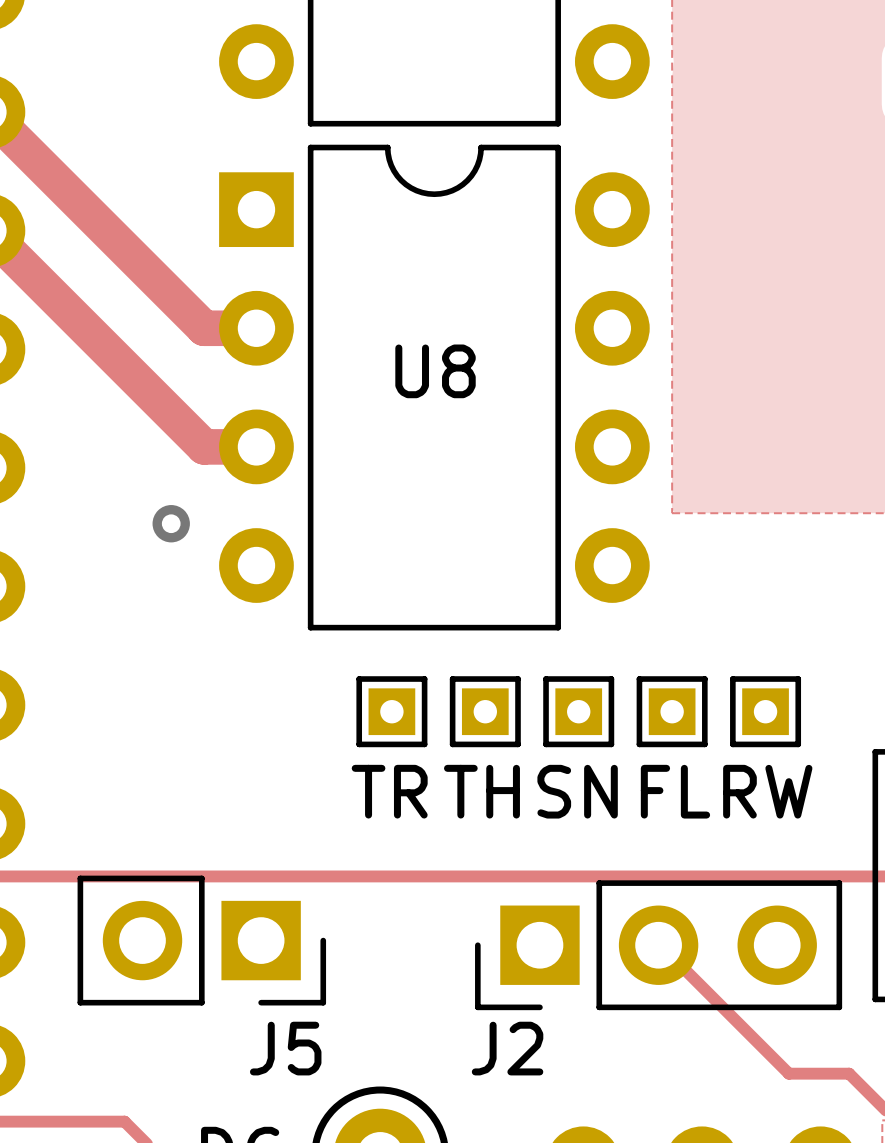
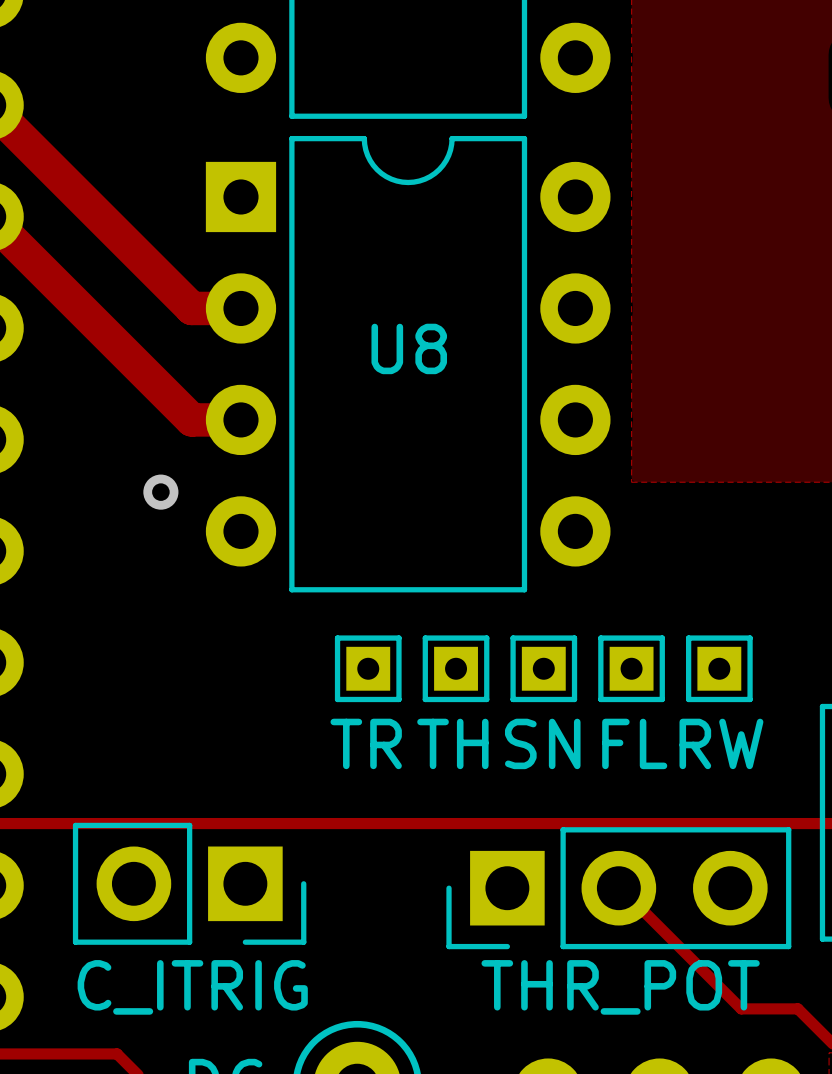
J5 name: J5 (285, 1048) -> none
J2 name: J2 (507, 1048) -> none
text: none -> C_ITRIG (192, 987)
text: none -> THR_POT (620, 987)

